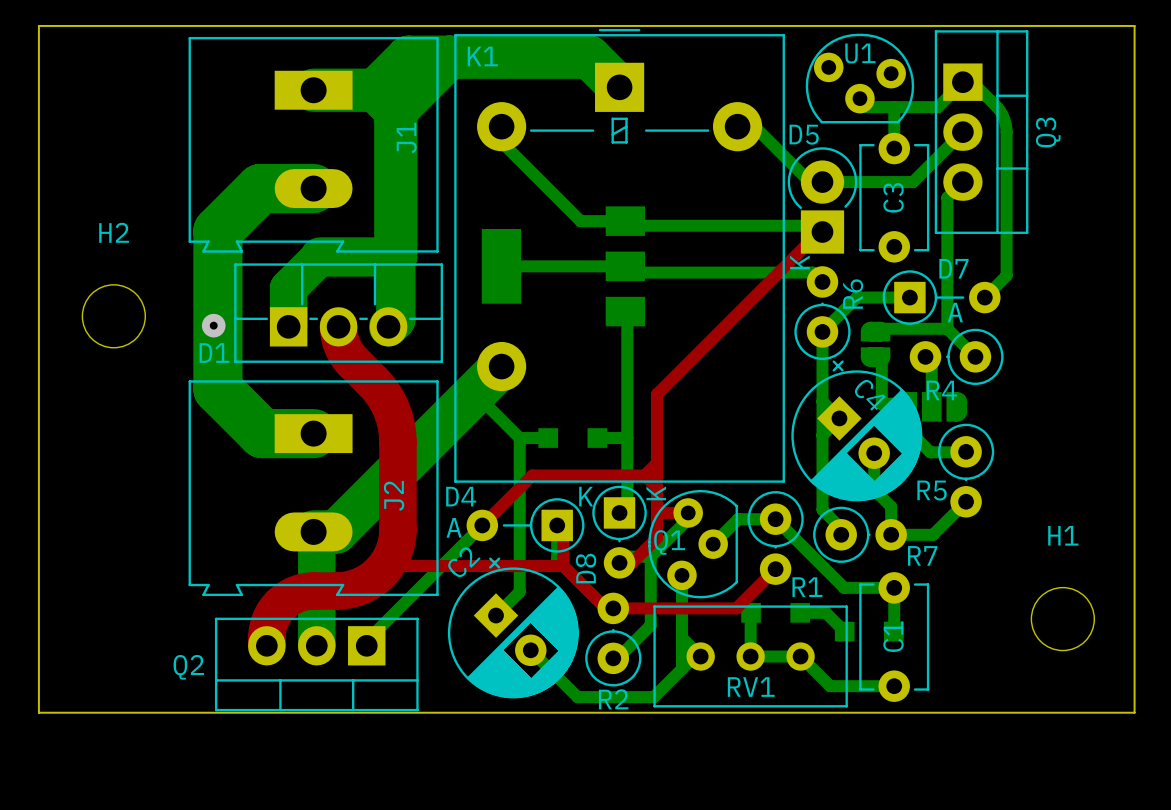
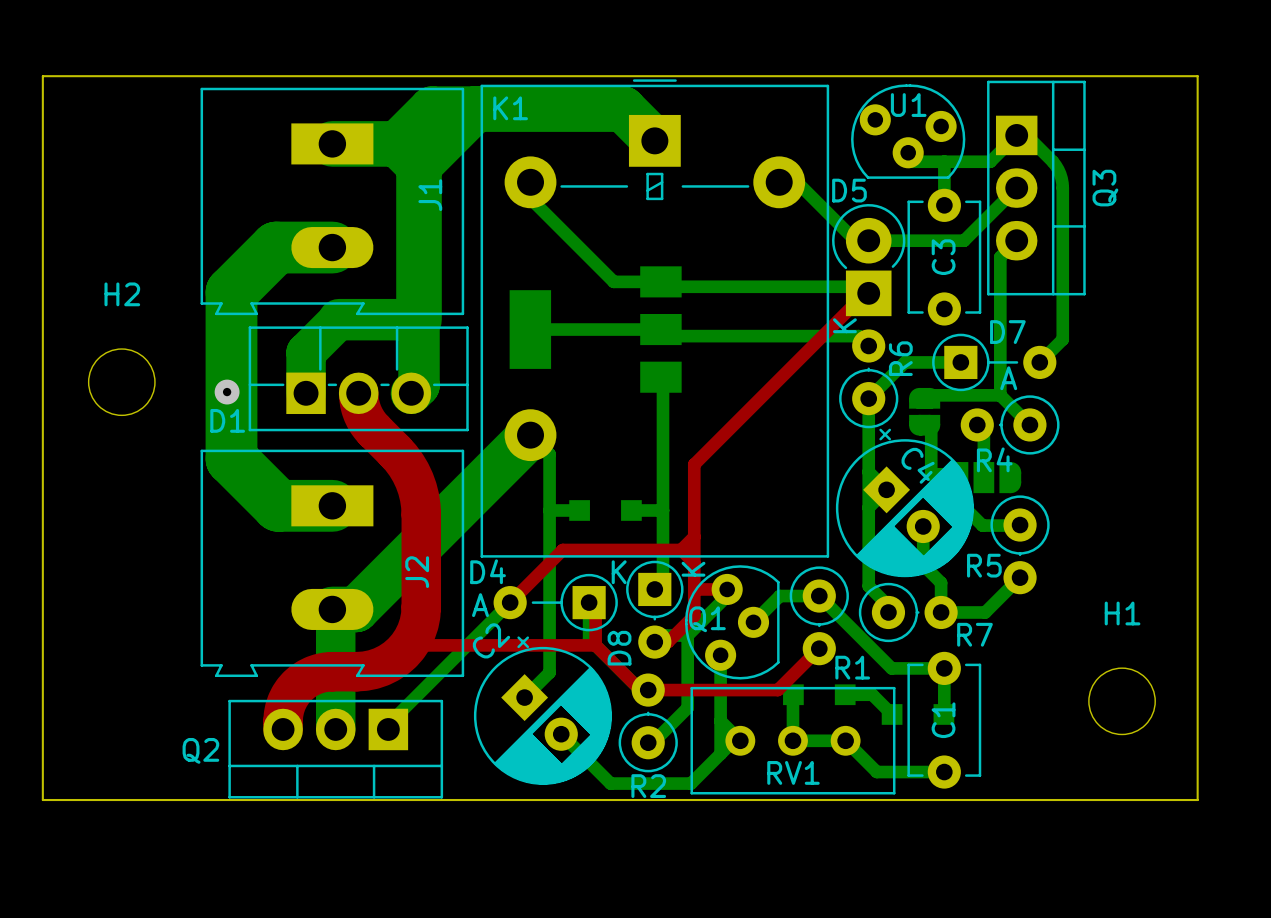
bottom track: (485, 403) (519, 438) -> (530, 435) (549, 454) (549, 510)

